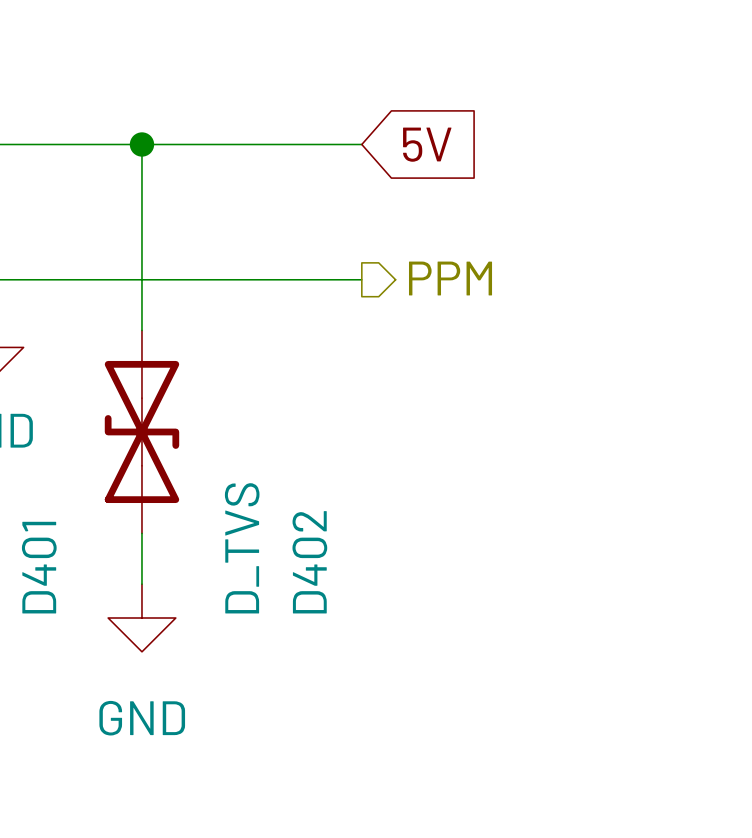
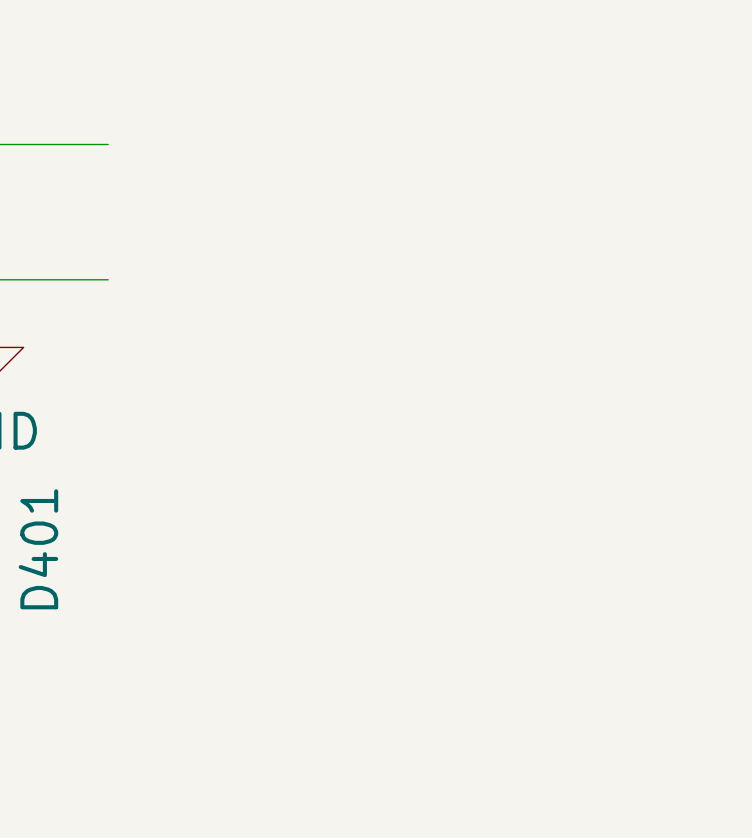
wire: (108, 144) (361, 144) -> none
wire: (141, 144) (141, 330) -> none
junction: (141, 144) -> none
global label: 5V (427, 144) -> none
hierarchical label: PPM (450, 278) -> none
wire: (108, 279) (361, 279) -> none
D402: D_TVS (141, 431) -> none
wire: (141, 533) (141, 584) -> none
power symbol: GND (141, 618) -> none

